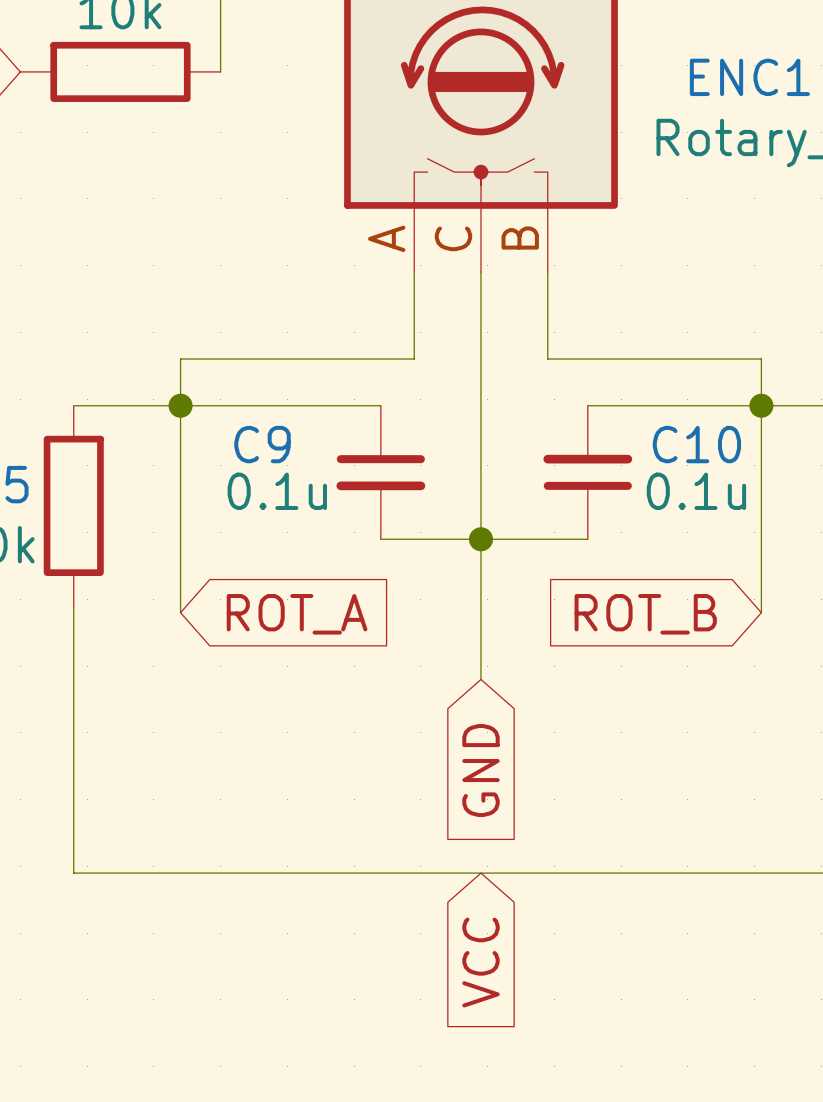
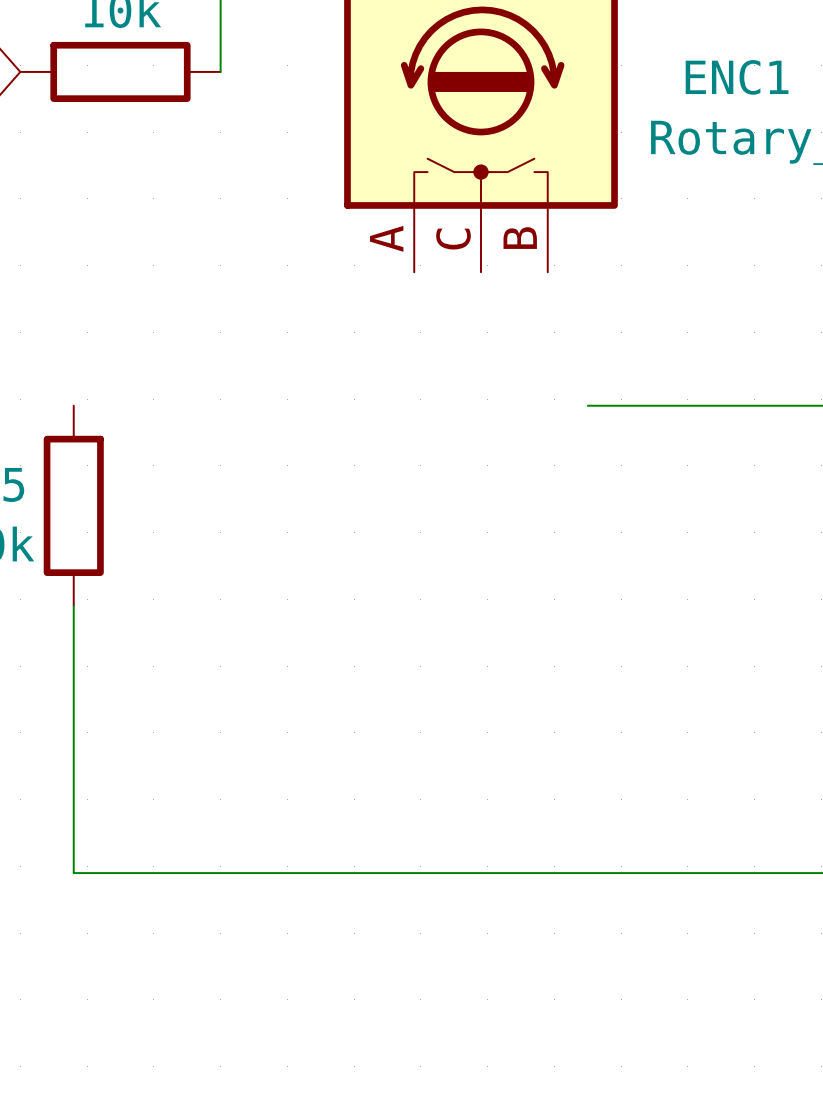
wire: (414, 272) (414, 359) (180, 359) (180, 612) -> none
wire: (480, 272) (480, 679) -> none
wire: (547, 272) (547, 359) (761, 359) (761, 612) -> none
wire: (73, 405) (380, 405) -> none
junction: (180, 405) -> none
junction: (761, 405) -> none
C9: 0.1u (380, 472) -> none
C10: 0.1u (587, 472) -> none
wire: (380, 539) (587, 539) -> none
junction: (480, 539) -> none
global label: ROT_A (297, 614) -> none
global label: ROT_B (645, 614) -> none
global label: GND (480, 770) -> none
global label: VCC (480, 962) -> none

